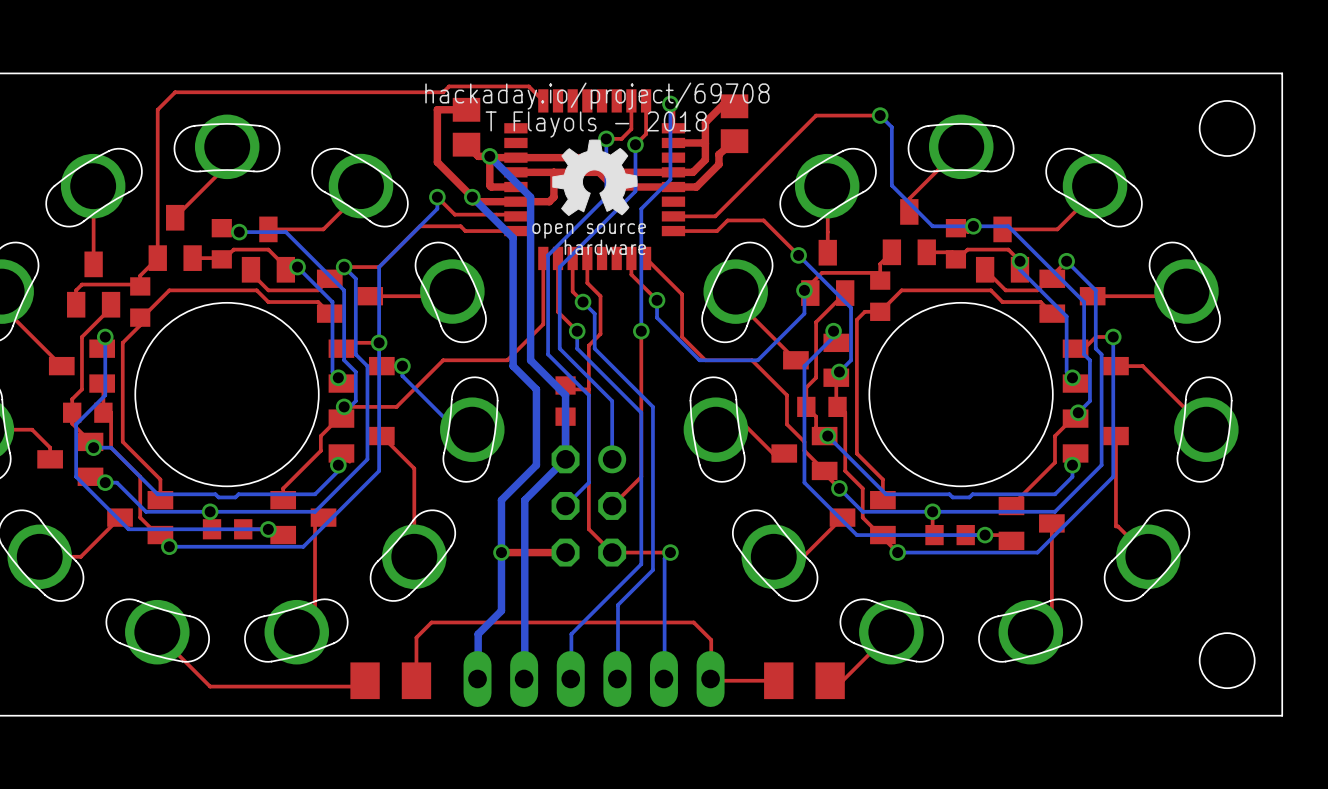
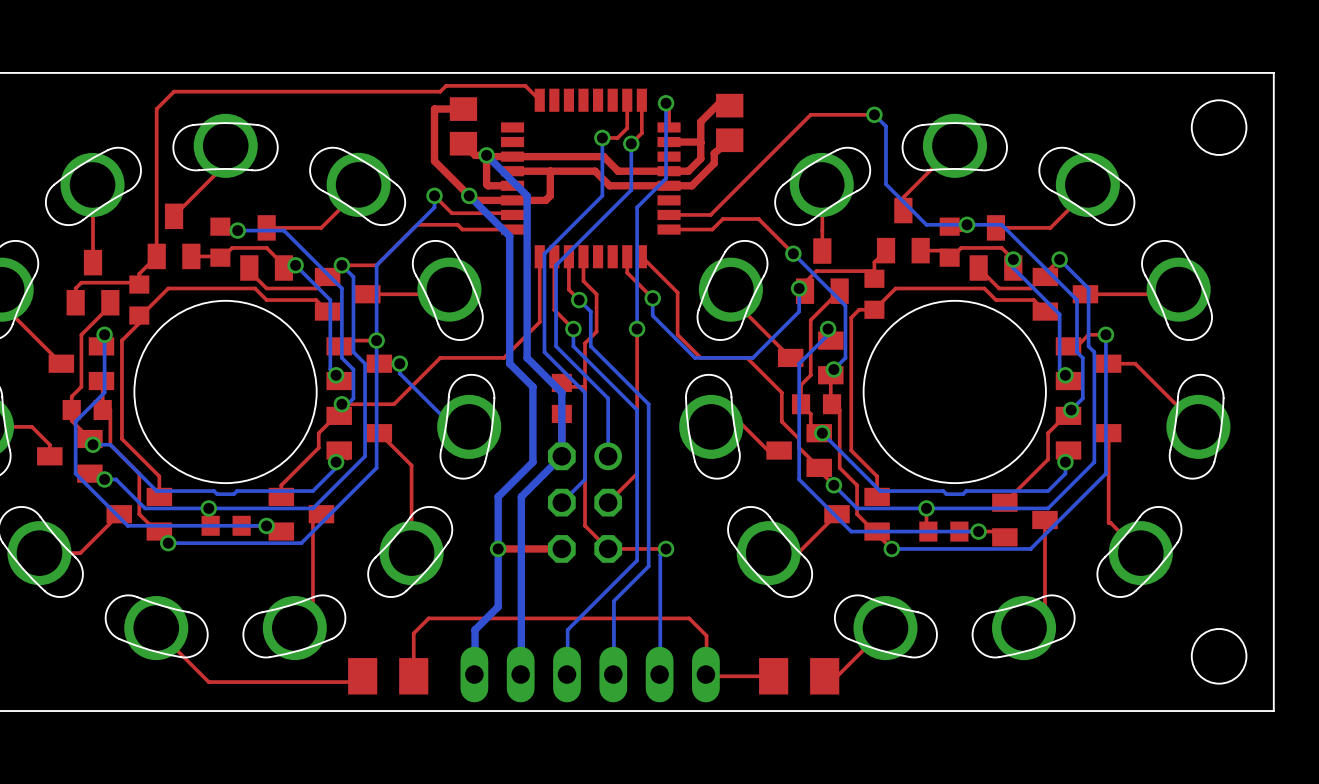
text: hackaday.io/project/69708 (597, 96) -> none
text: T Flayols - 2018 (596, 124) -> none
drawing: [552, 139, 638, 217] -> none

